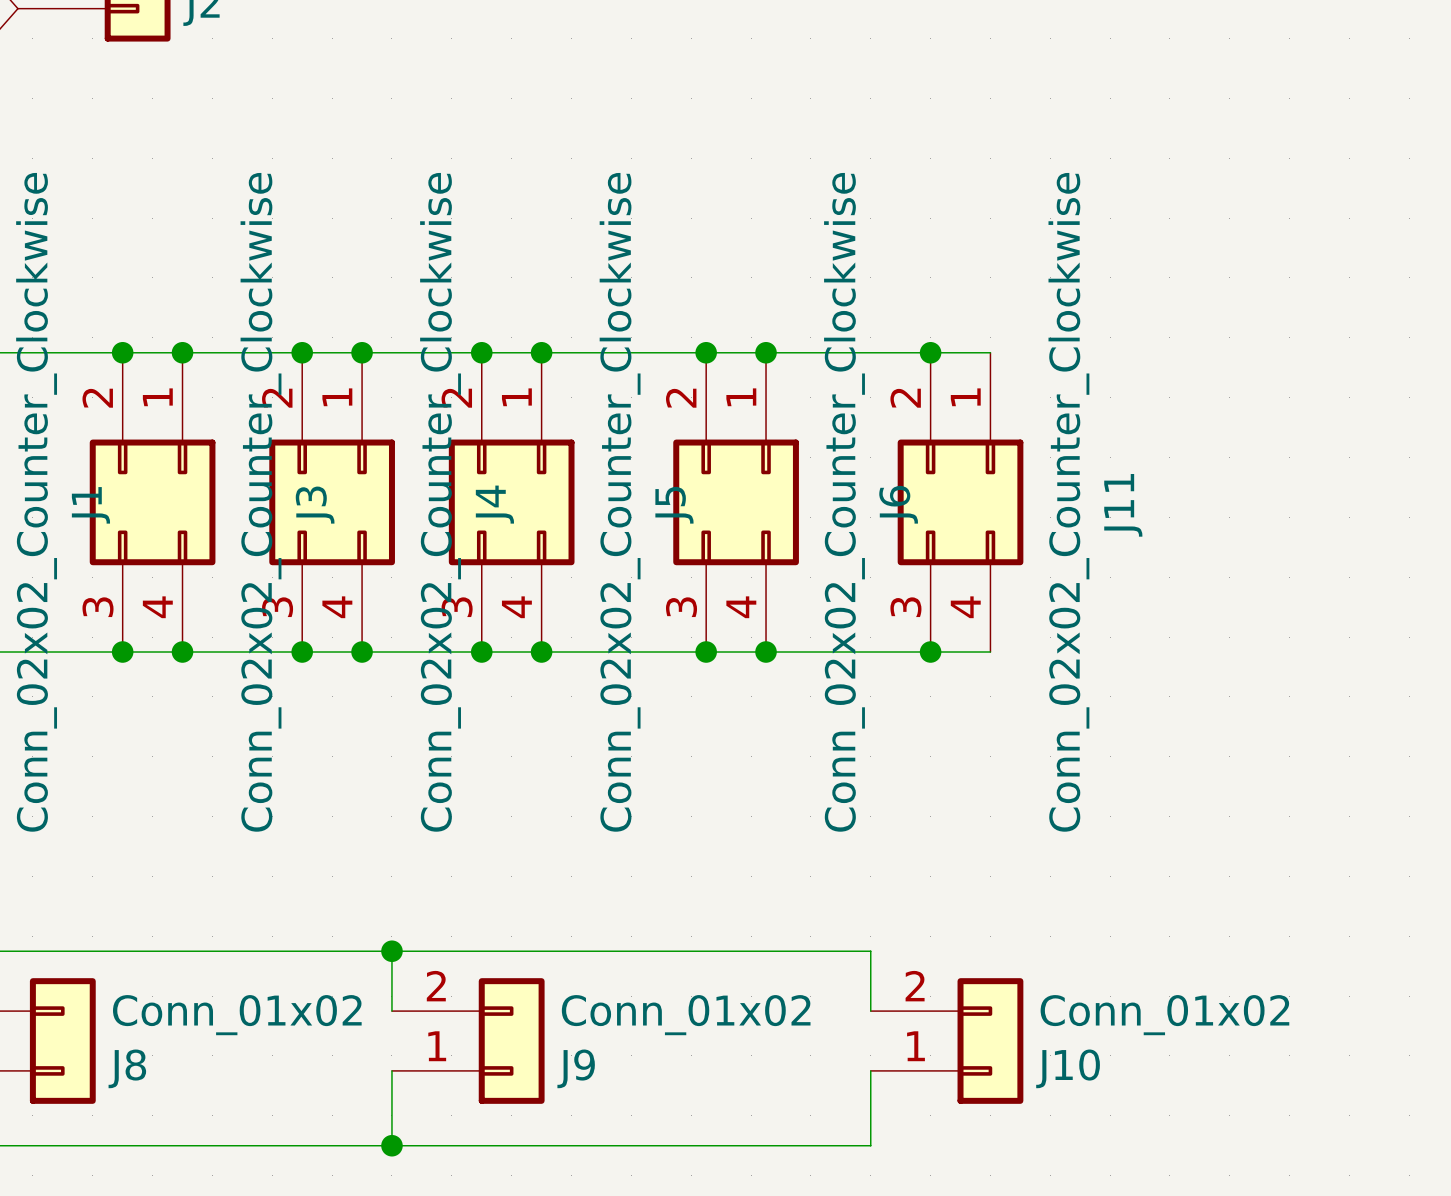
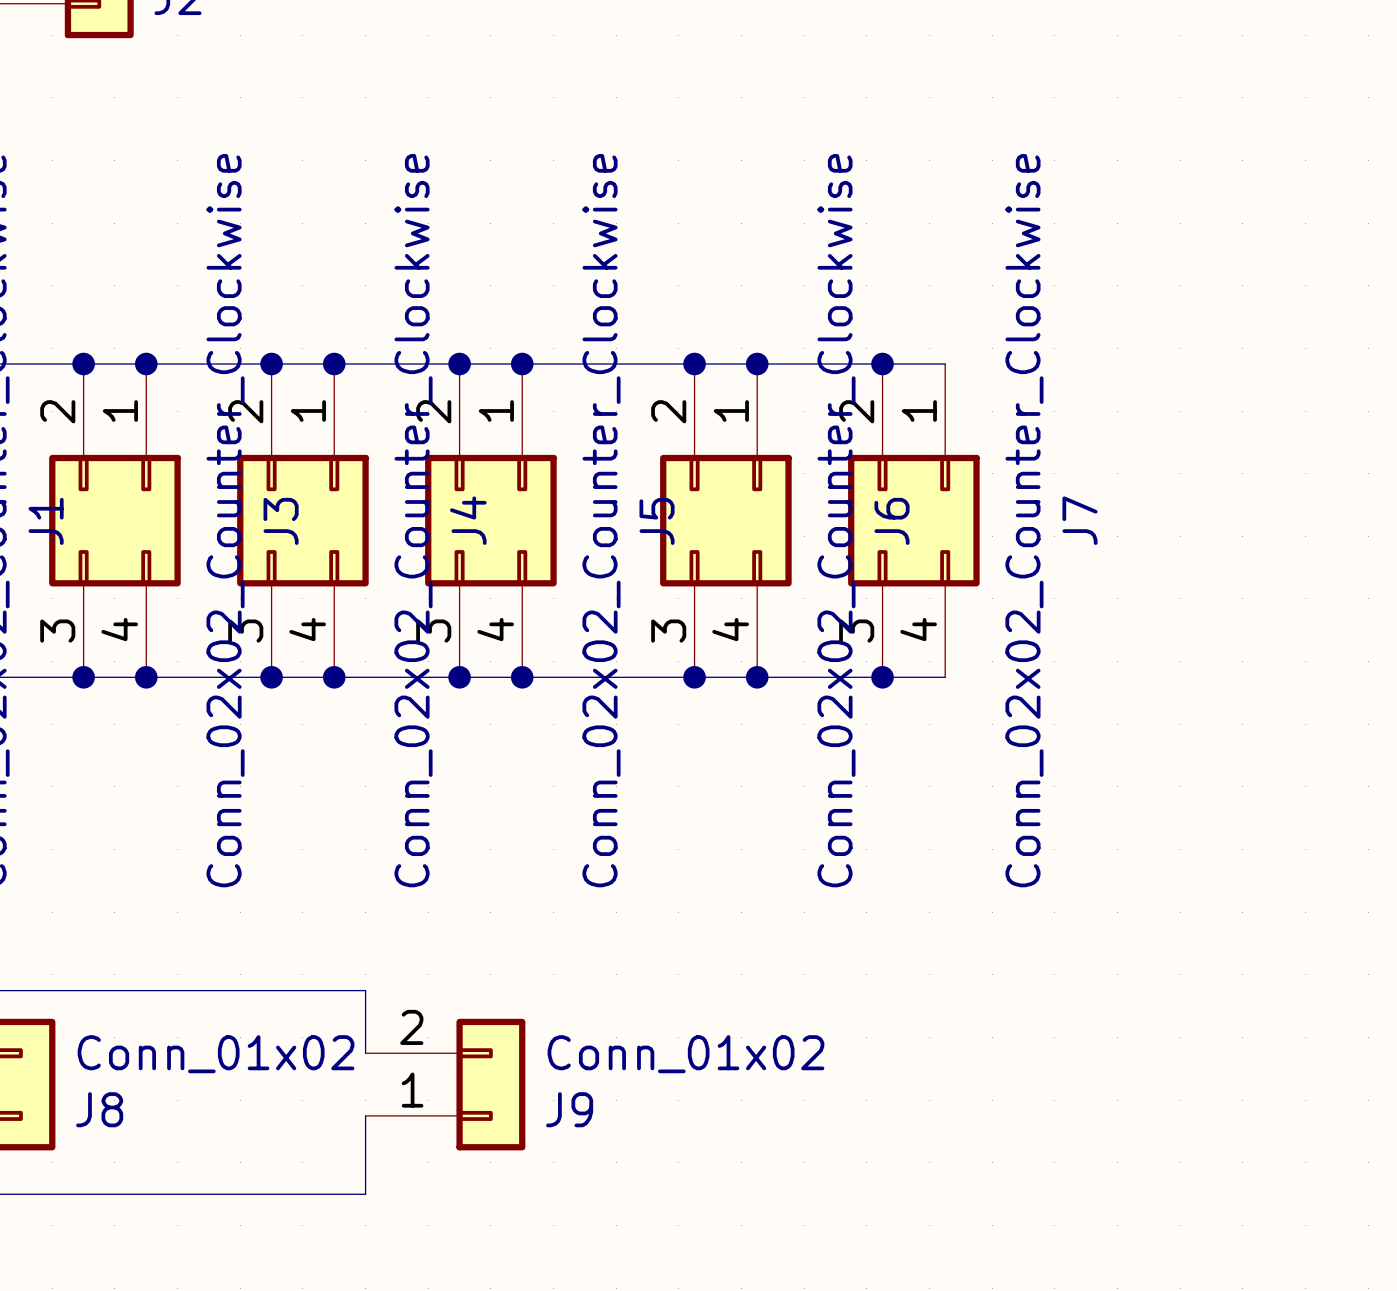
junction position: (930, 352) -> (882, 364)
wire: (945, 352) (990, 352) -> none
J7: none -> Conn_02x02_Counter_Clockwise (913, 520)
J11: Conn_02x02_Counter_Clockwise (960, 502) -> none
junction position: (930, 652) -> (882, 677)
wire: (945, 652) (990, 652) -> none
wire: (391, 951) (870, 951) (870, 1011) -> none
junction: (391, 951) -> none
J10: Conn_01x02 (947, 1041) -> none
wire: (870, 1070) (870, 1145) (391, 1145) -> none
junction: (391, 1145) -> none

